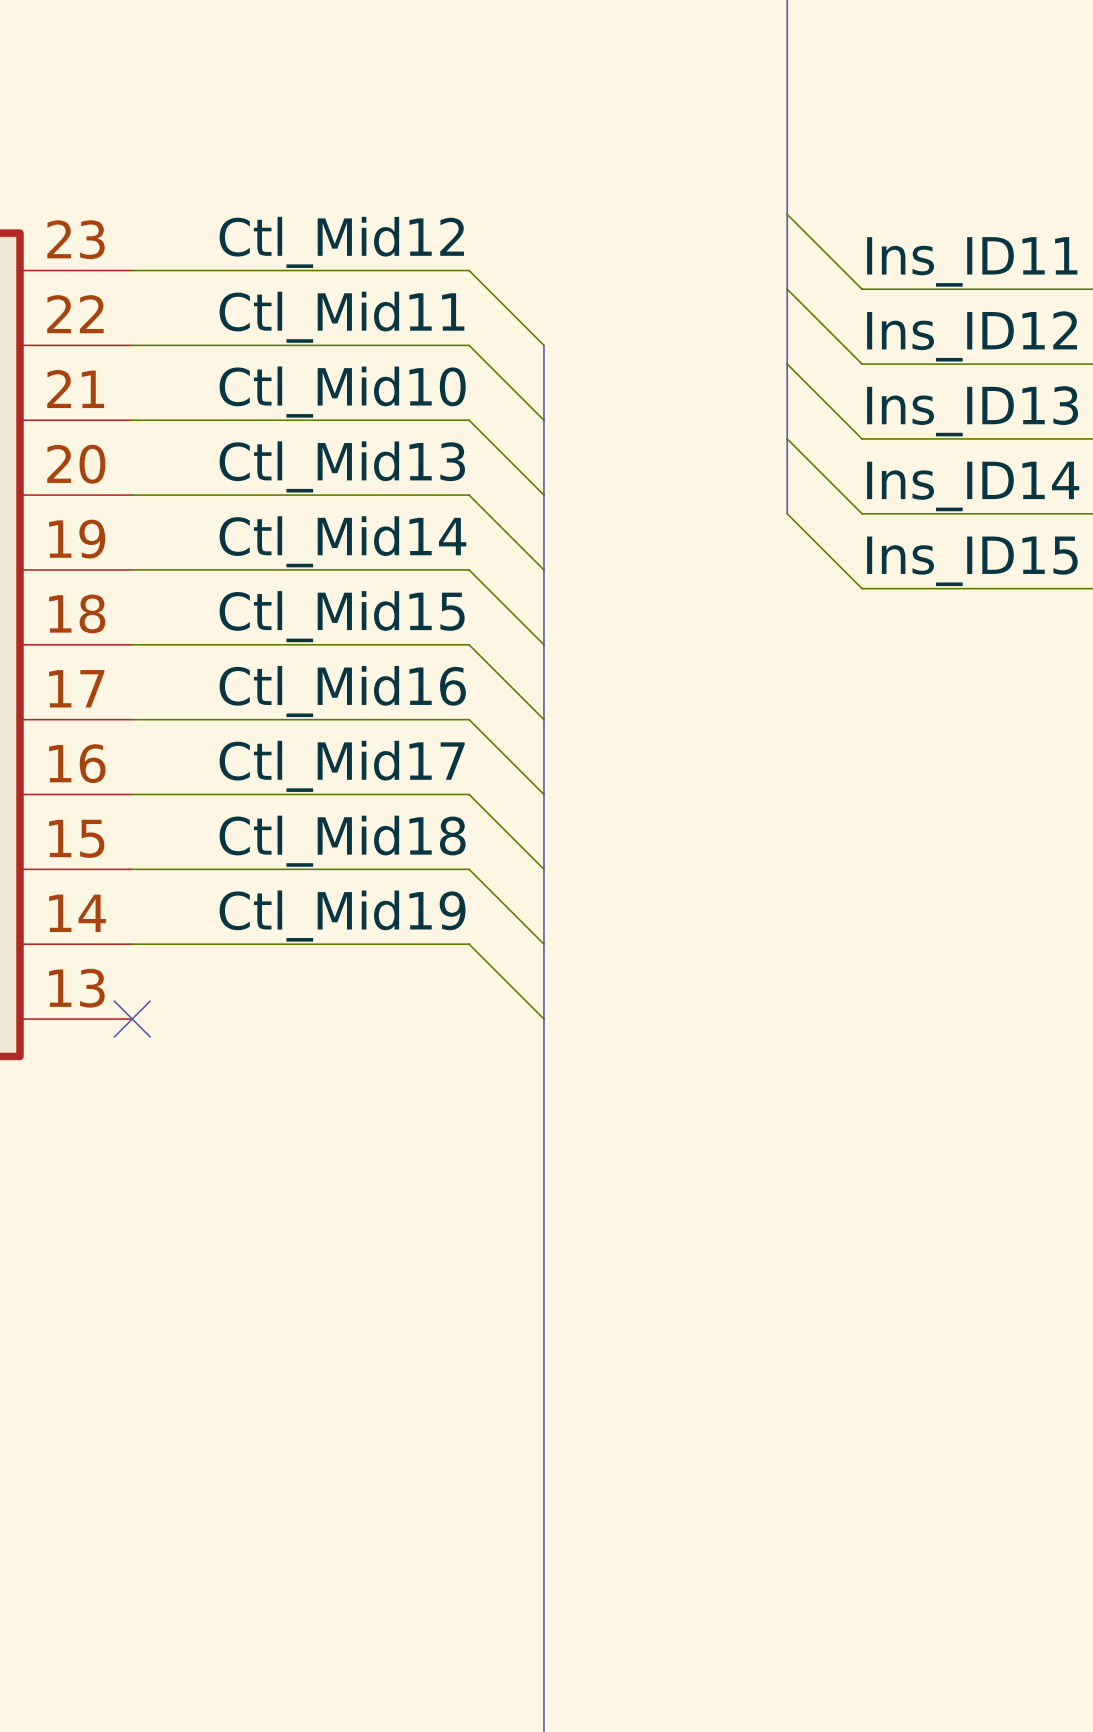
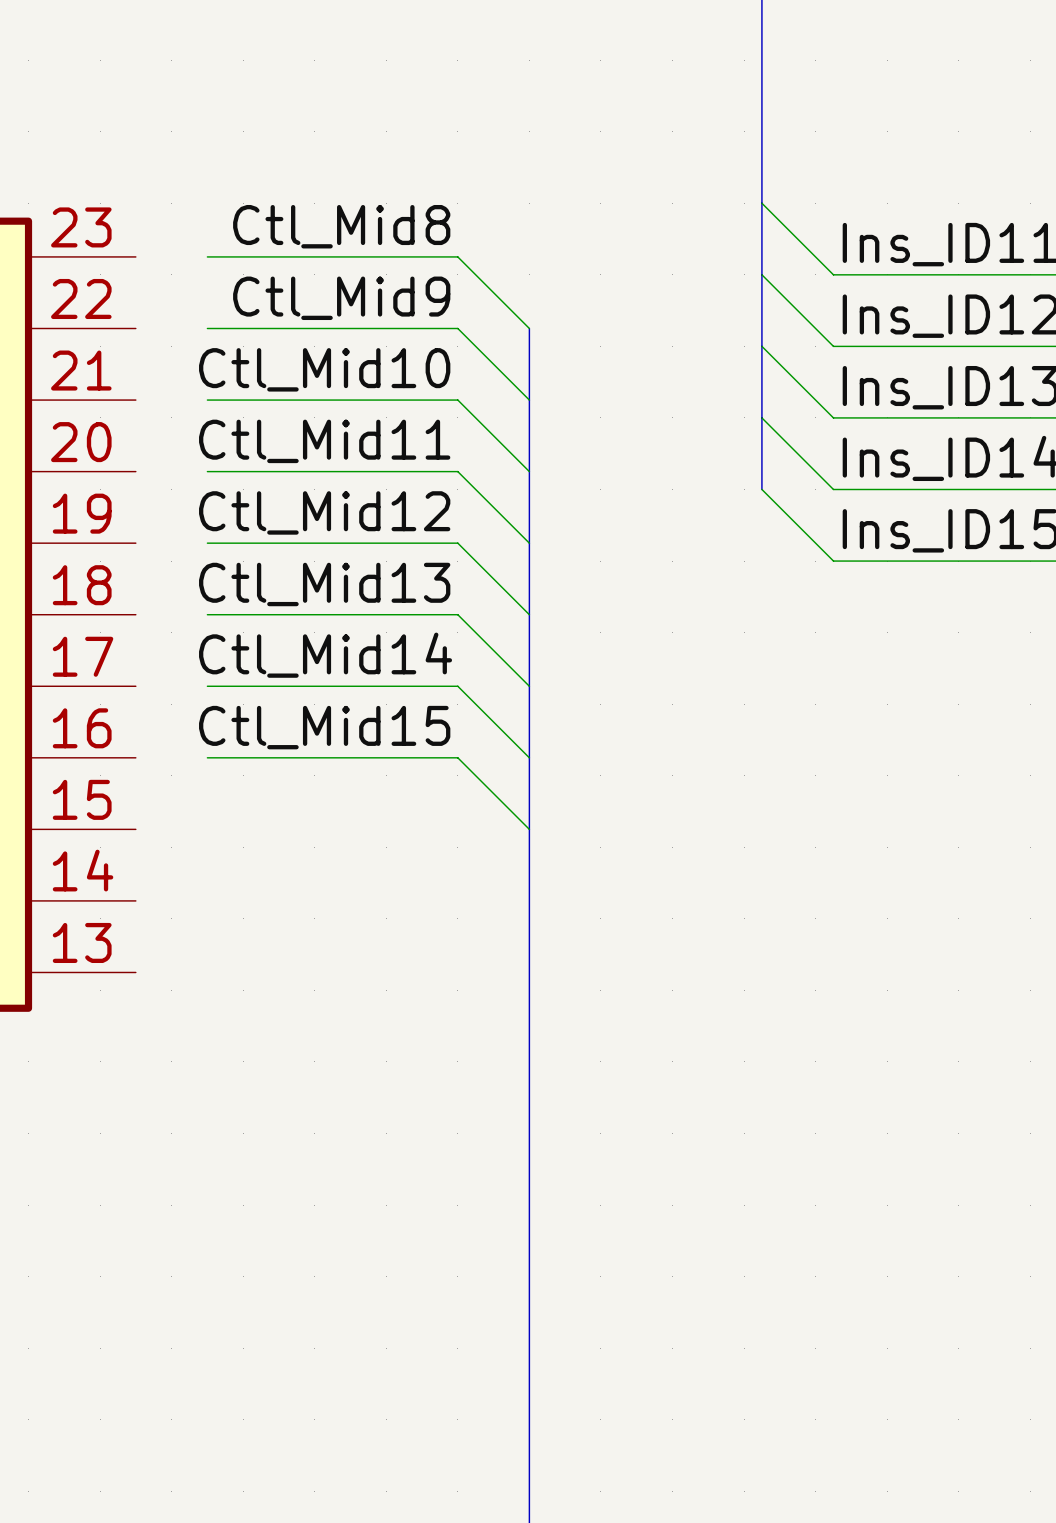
label: Ctl_Mid12 (341, 242) -> Ctl_Mid8 (341, 226)
wire: (132, 270) (207, 270) -> none
label: Ctl_Mid11 (341, 317) -> Ctl_Mid9 (341, 298)
wire: (132, 345) (207, 345) -> none
wire: (132, 420) (207, 420) -> none
label: Ctl_Mid13 (342, 466) -> Ctl_Mid11 (324, 441)
wire: (132, 495) (207, 495) -> none
label: Ctl_Mid14 (342, 541) -> Ctl_Mid12 (324, 512)
wire: (132, 569) (207, 569) -> none
label: Ctl_Mid15 (342, 616) -> Ctl_Mid13 (324, 584)
wire: (132, 644) (207, 644) -> none
label: Ctl_Mid16 (342, 691) -> Ctl_Mid14 (325, 655)
wire: (132, 719) (207, 719) -> none
label: Ctl_Mid17 (342, 766) -> Ctl_Mid15 (324, 727)
wire: (132, 794) (207, 794) -> none
label: Ctl_Mid18 (342, 841) -> none
wire: (132, 869) (469, 869) (543, 944) -> none
label: Ctl_Mid19 (342, 916) -> none
wire: (132, 944) (469, 944) (543, 1019) -> none
no-connect mark: (132, 1019) -> none

